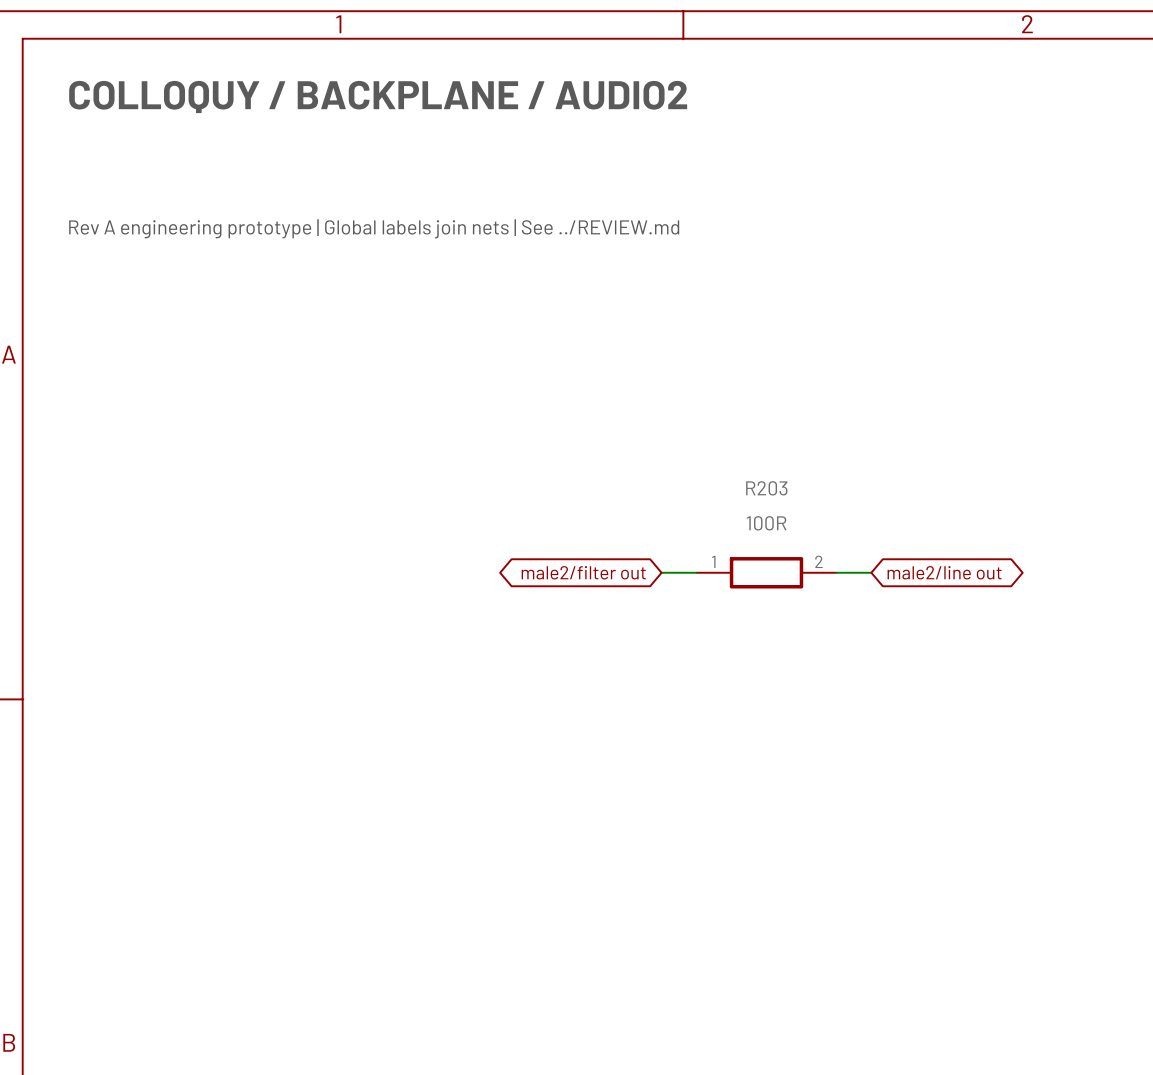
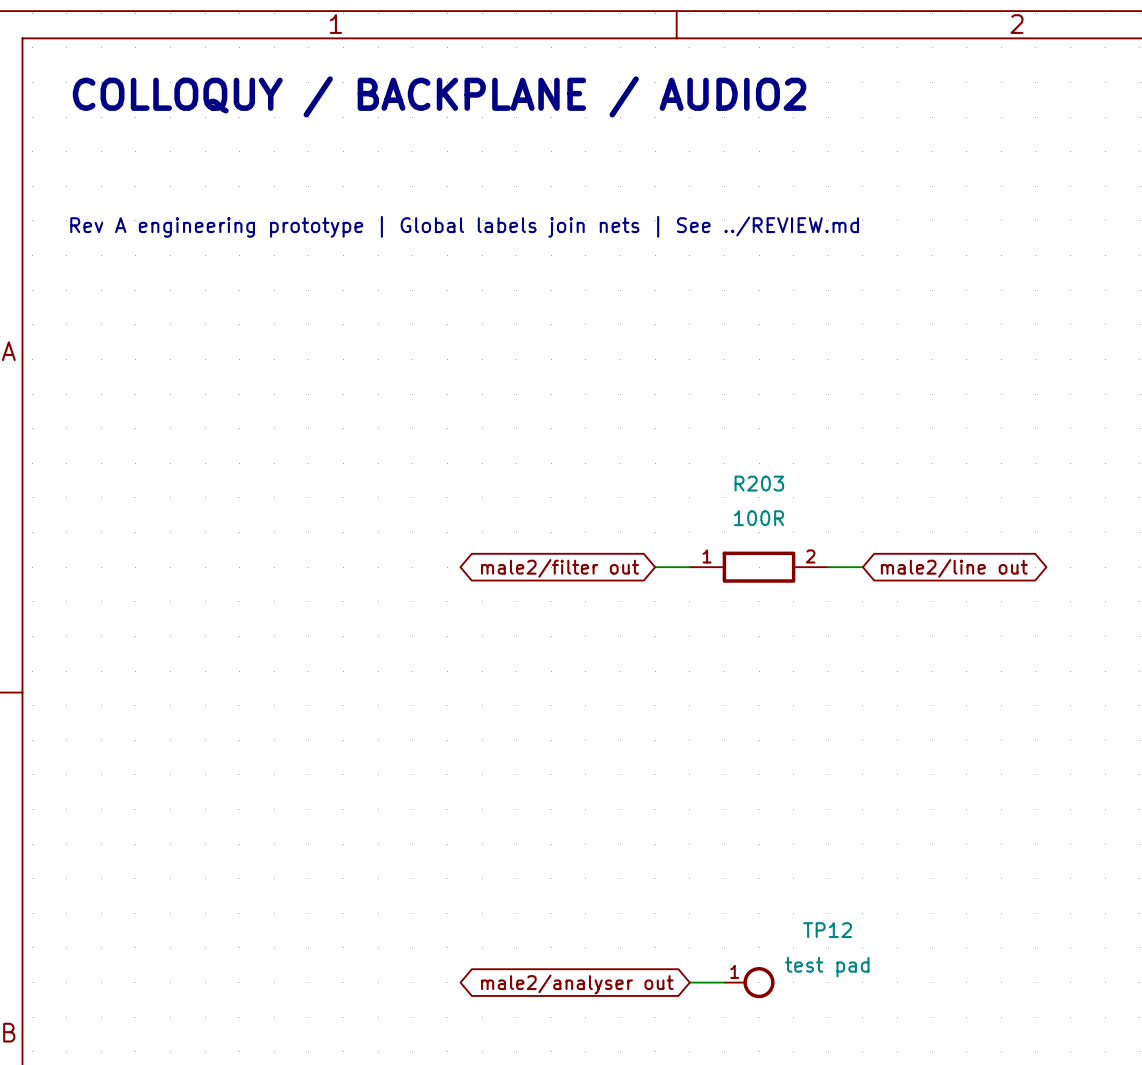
wire: none -> (689, 982) (724, 982)
TP12: none -> test pad (749, 982)
global label: none -> male2/analyser out (577, 984)

